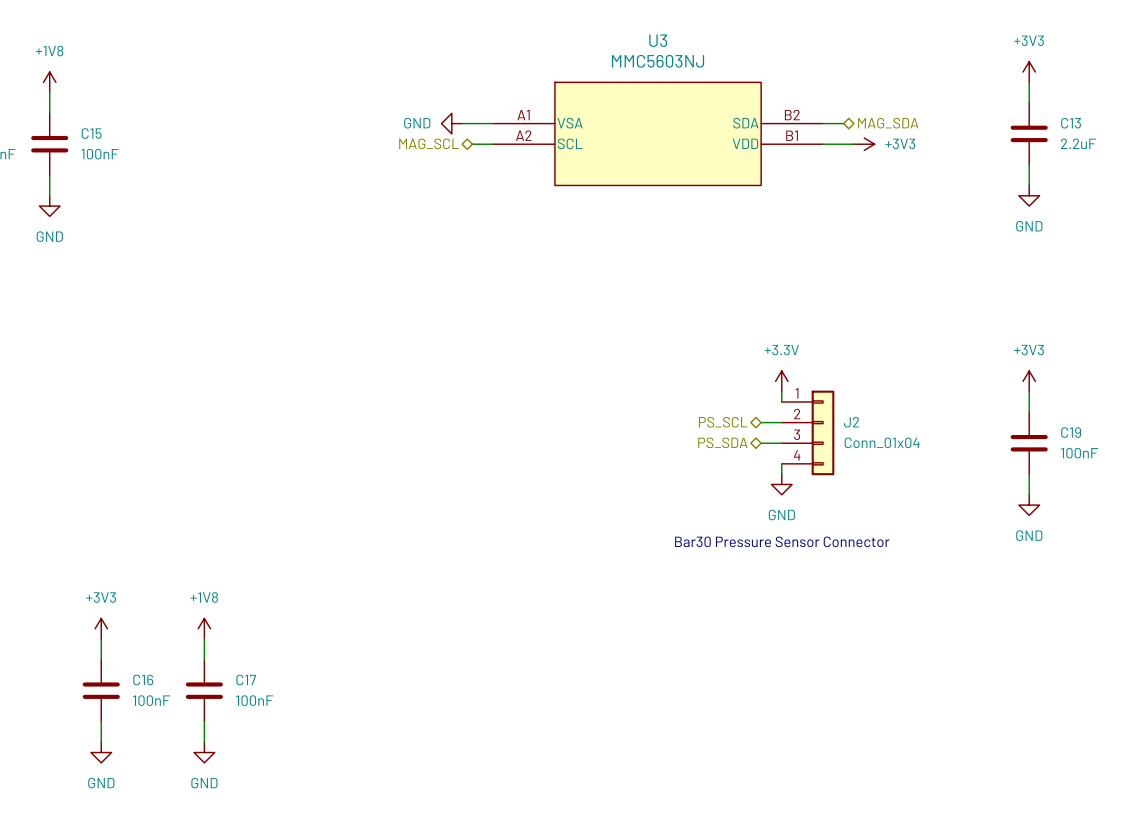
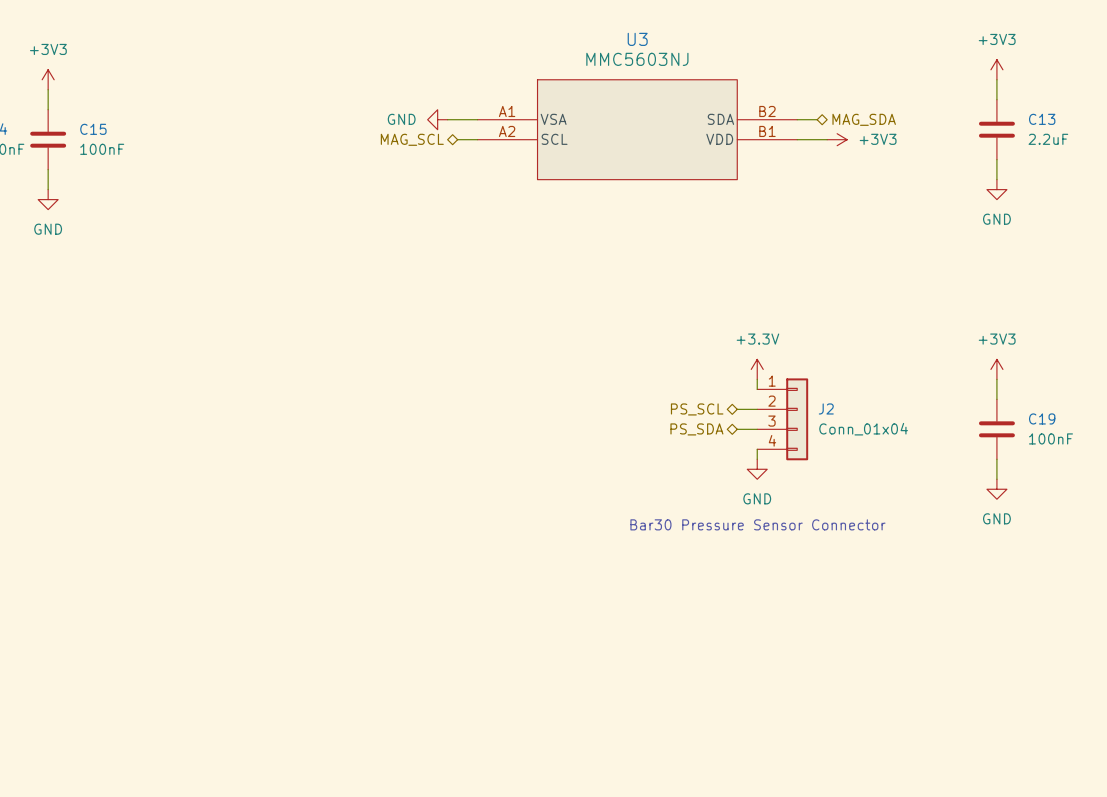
power symbol: +1V8 (49, 82) -> +3V3 (48, 79)
power symbol: +3V3 (101, 628) -> none
power symbol: +1V8 (204, 628) -> none
wire: (101, 639) (101, 659) -> none
wire: (204, 639) (204, 659) -> none
C16: 100nF (101, 690) -> none
C17: 100nF (204, 690) -> none
wire: (101, 721) (101, 742) -> none
wire: (204, 721) (204, 742) -> none
power symbol: GND (101, 752) -> none
power symbol: GND (204, 752) -> none

